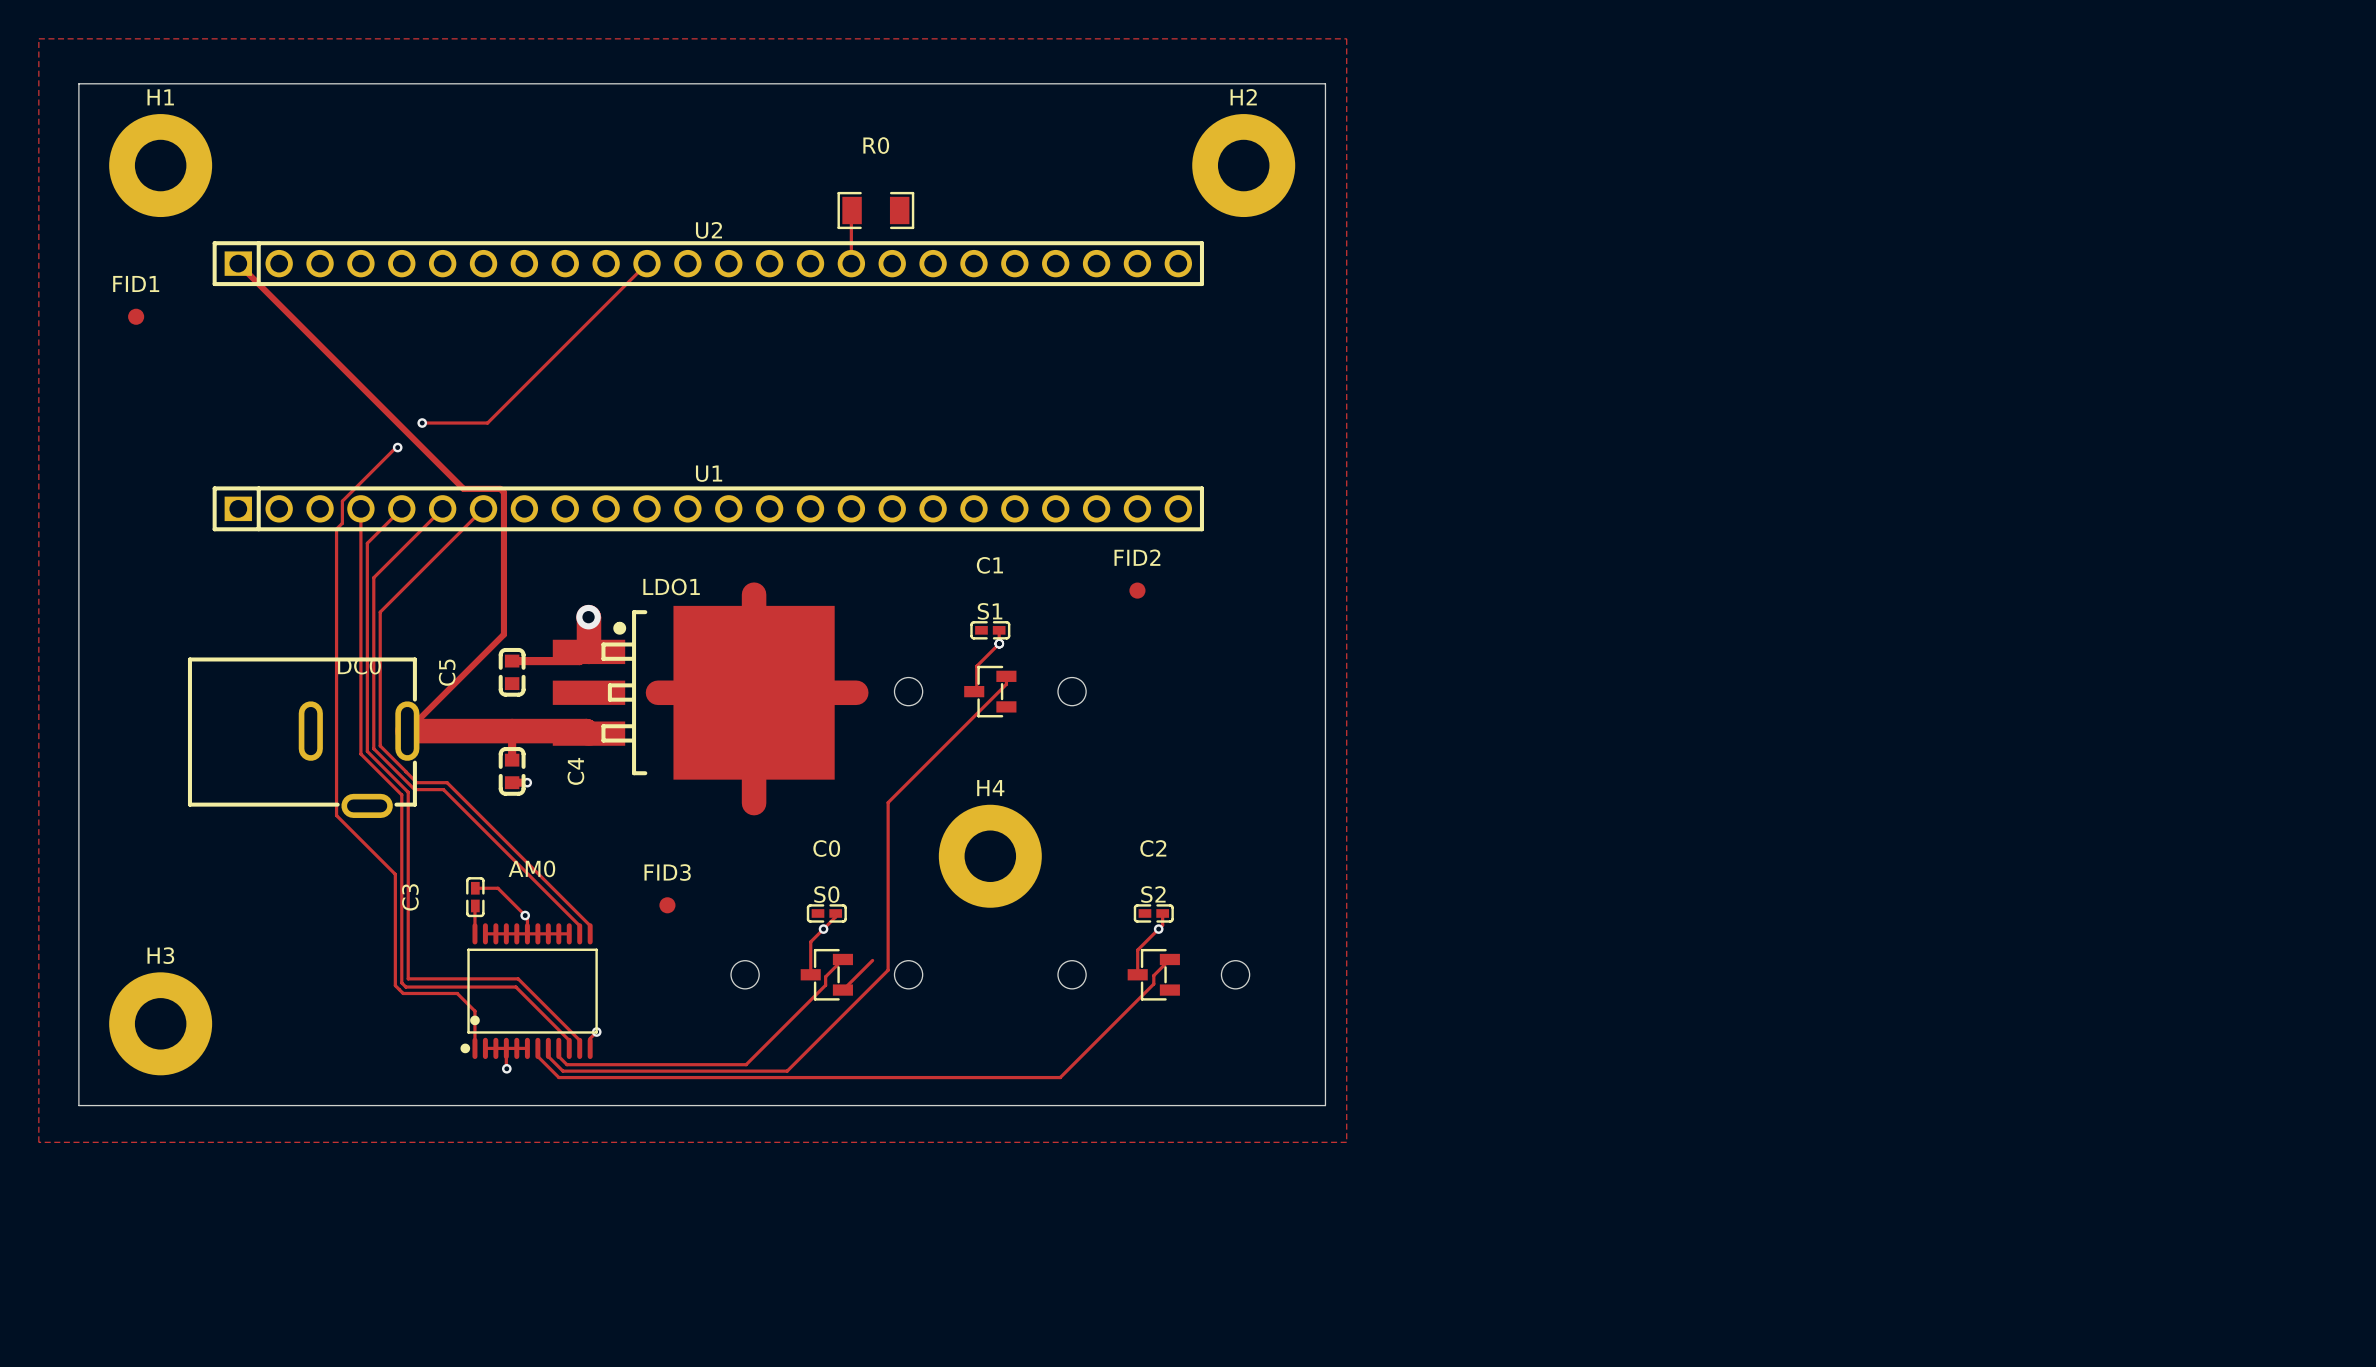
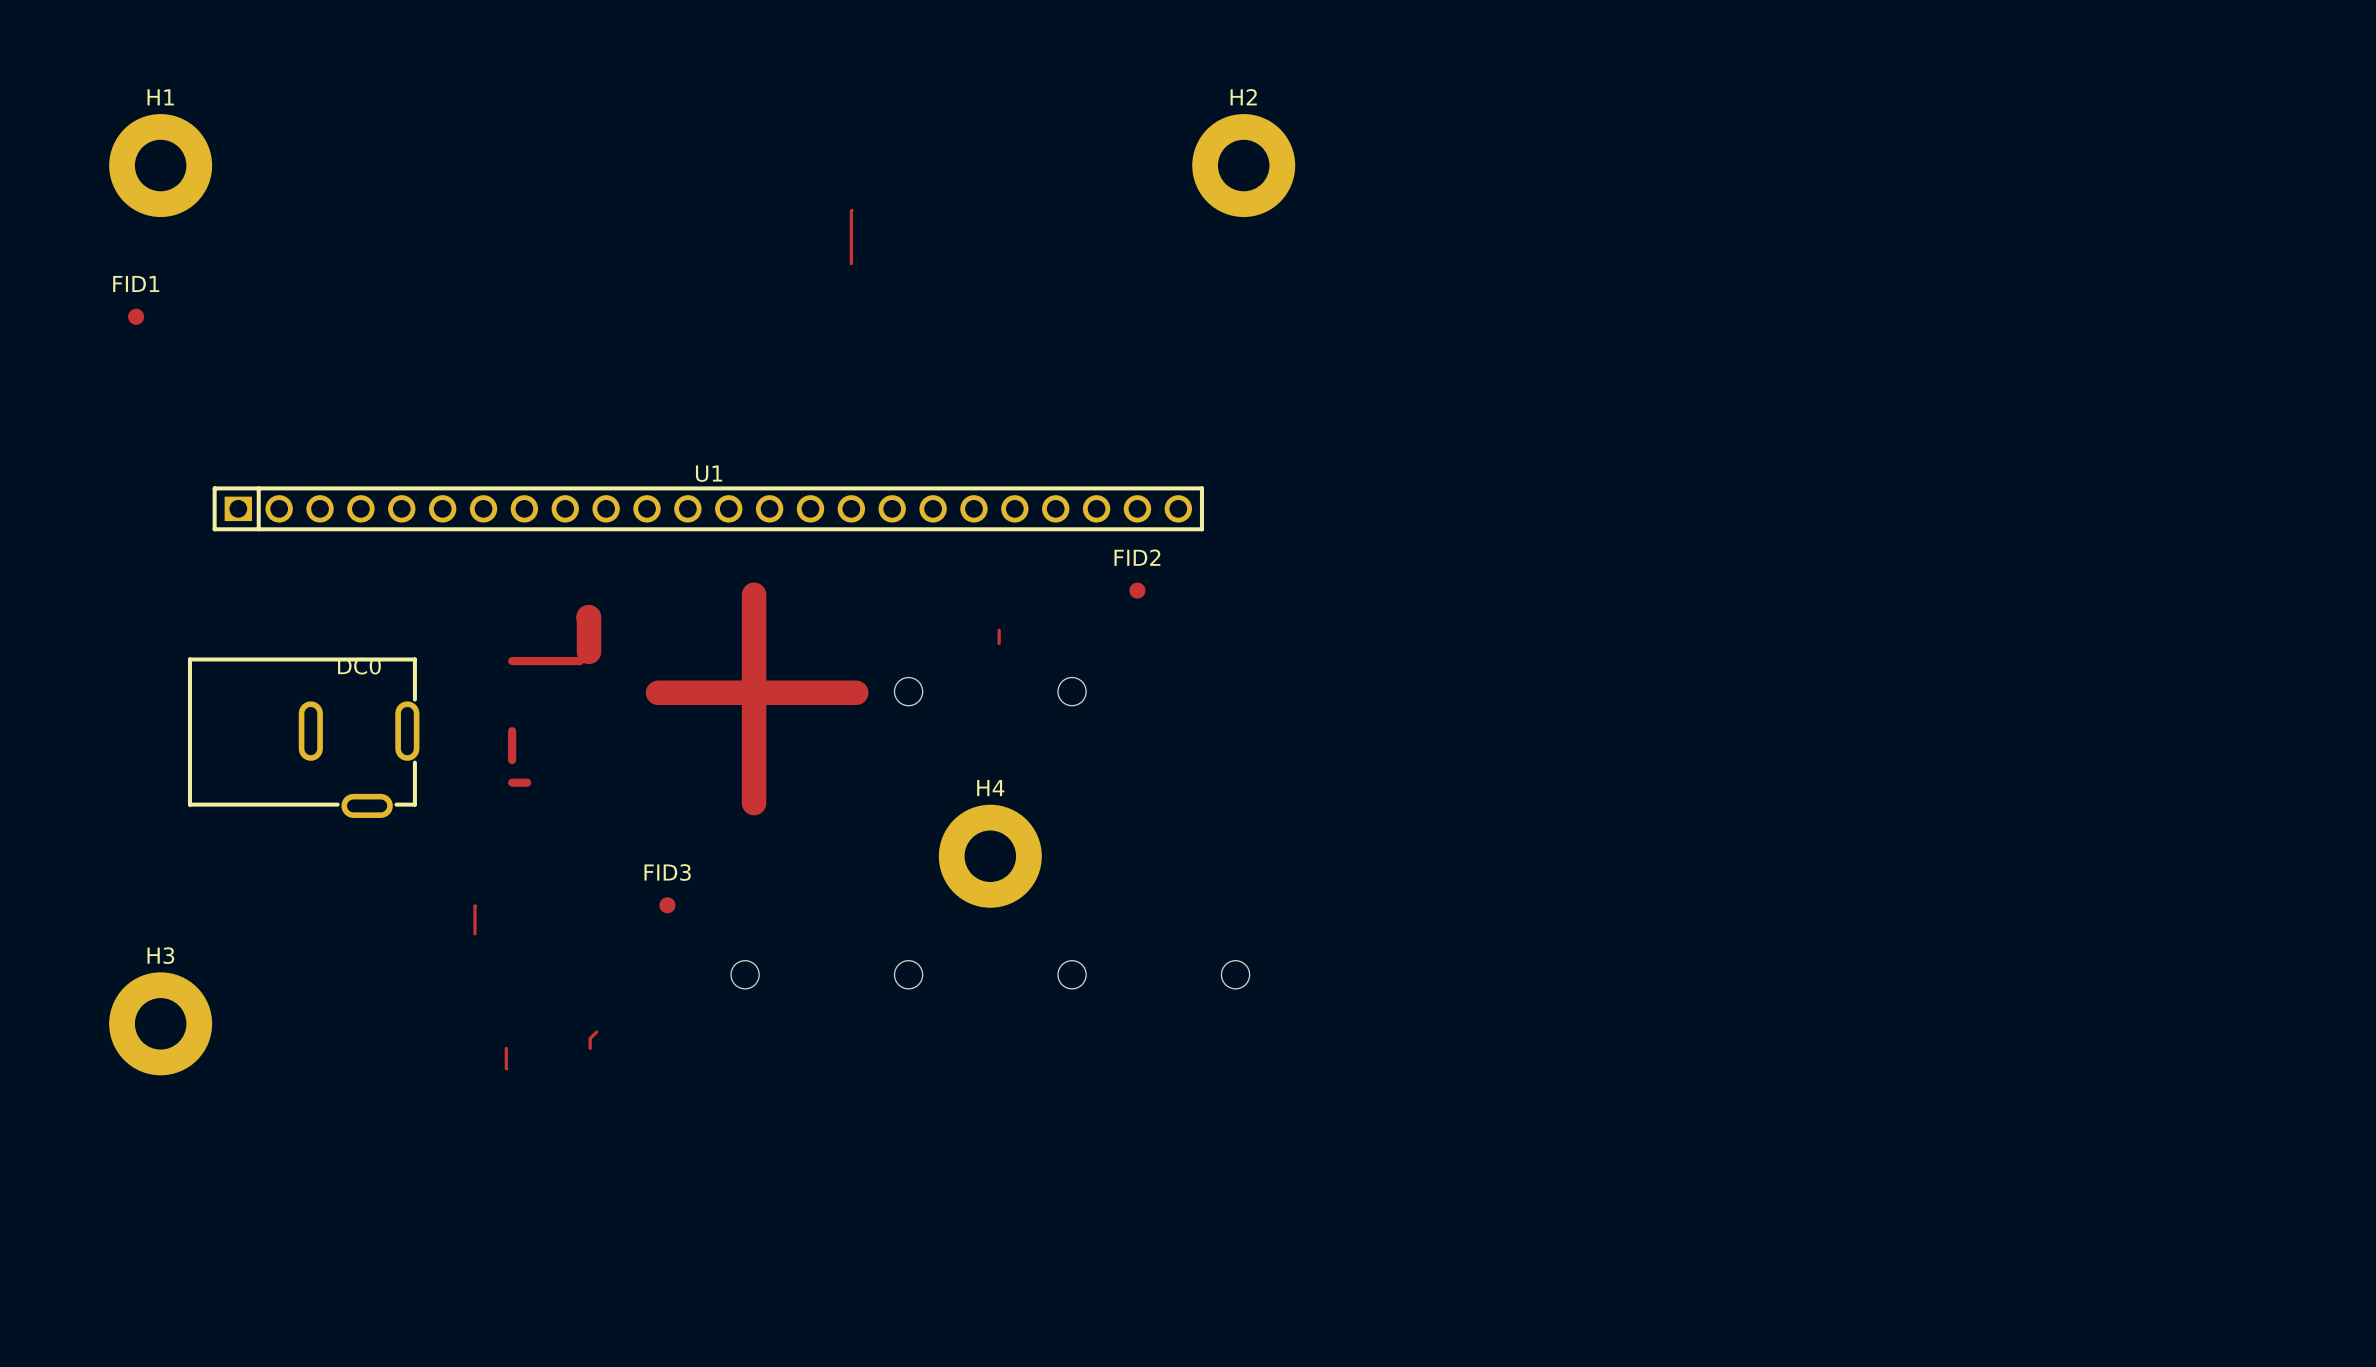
zone outline: (38, 38) (1346, 38) (1346, 1142) (38, 1142) (38, 38) -> none
board edge: (78, 83) (1325, 83) (1325, 1105) (78, 1105) (78, 83) -> none
R0: (875, 210) -> none
track: (238, 263) (463, 488) (500, 488) (503, 492) (503, 634) (407, 731) (586, 731) (588, 733) -> none
track: (647, 263) (487, 423) (422, 423) -> none
U2: (708, 263) -> none
via: (422, 423) -> none
track: (397, 447) (342, 501) (342, 523) (336, 529) (336, 815) (395, 874) (395, 985) (403, 993) (457, 993) (474, 1011) (474, 1048) -> none
via: (397, 447) -> none
track: (360, 508) (360, 754) (401, 794) (401, 982) (405, 987) (515, 987) (569, 1040) (569, 1048) -> none
track: (401, 508) (367, 543) (367, 751) (408, 792) (408, 978) (518, 978) (579, 1040) (579, 1048) -> none
track: (442, 508) (373, 577) (373, 748) (414, 789) (443, 789) (579, 925) (579, 933) -> none
track: (483, 508) (380, 612) (380, 745) (405, 771) -> none
via: (588, 617) -> none
C1: (990, 630) -> none
track: (999, 643) (976, 666) (976, 689) (974, 691) -> none
via: (999, 643) -> none
C5: (512, 672) -> none
track: (1006, 676) (1006, 684) (888, 802) (888, 970) (787, 1071) (562, 1071) (548, 1056) (548, 1048) -> none
S1: (990, 691) -> none
LDO1: (693, 692) -> none
track: (405, 771) (416, 782) (447, 782) (590, 925) (590, 933) -> none
C4: (512, 771) -> none
via: (527, 782) -> none
track: (475, 888) (497, 888) (527, 917) (527, 933) -> none
C3: (475, 897) -> none
C0: (826, 913) -> none
track: (835, 913) (835, 916) (810, 941) (810, 974) -> none
C2: (1153, 913) -> none
track: (1162, 913) (1162, 925) (1137, 950) (1137, 974) -> none
via: (525, 915) -> none
via: (823, 929) -> none
via: (1158, 929) -> none
track: (485, 933) (569, 933) -> none
track: (842, 959) (825, 976) (825, 985) (746, 1064) (566, 1064) (558, 1056) (558, 1048) -> none
track: (1169, 959) (1153, 975) (1153, 984) (1060, 1077) (558, 1077) (537, 1056) (537, 1048) -> none
track: (872, 960) (843, 990) -> none
S0: (826, 974) -> none
S2: (1153, 974) -> none
AM0: (529, 991) -> none
via: (596, 1031) -> none
track: (485, 1048) (527, 1048) -> none
via: (506, 1068) -> none

